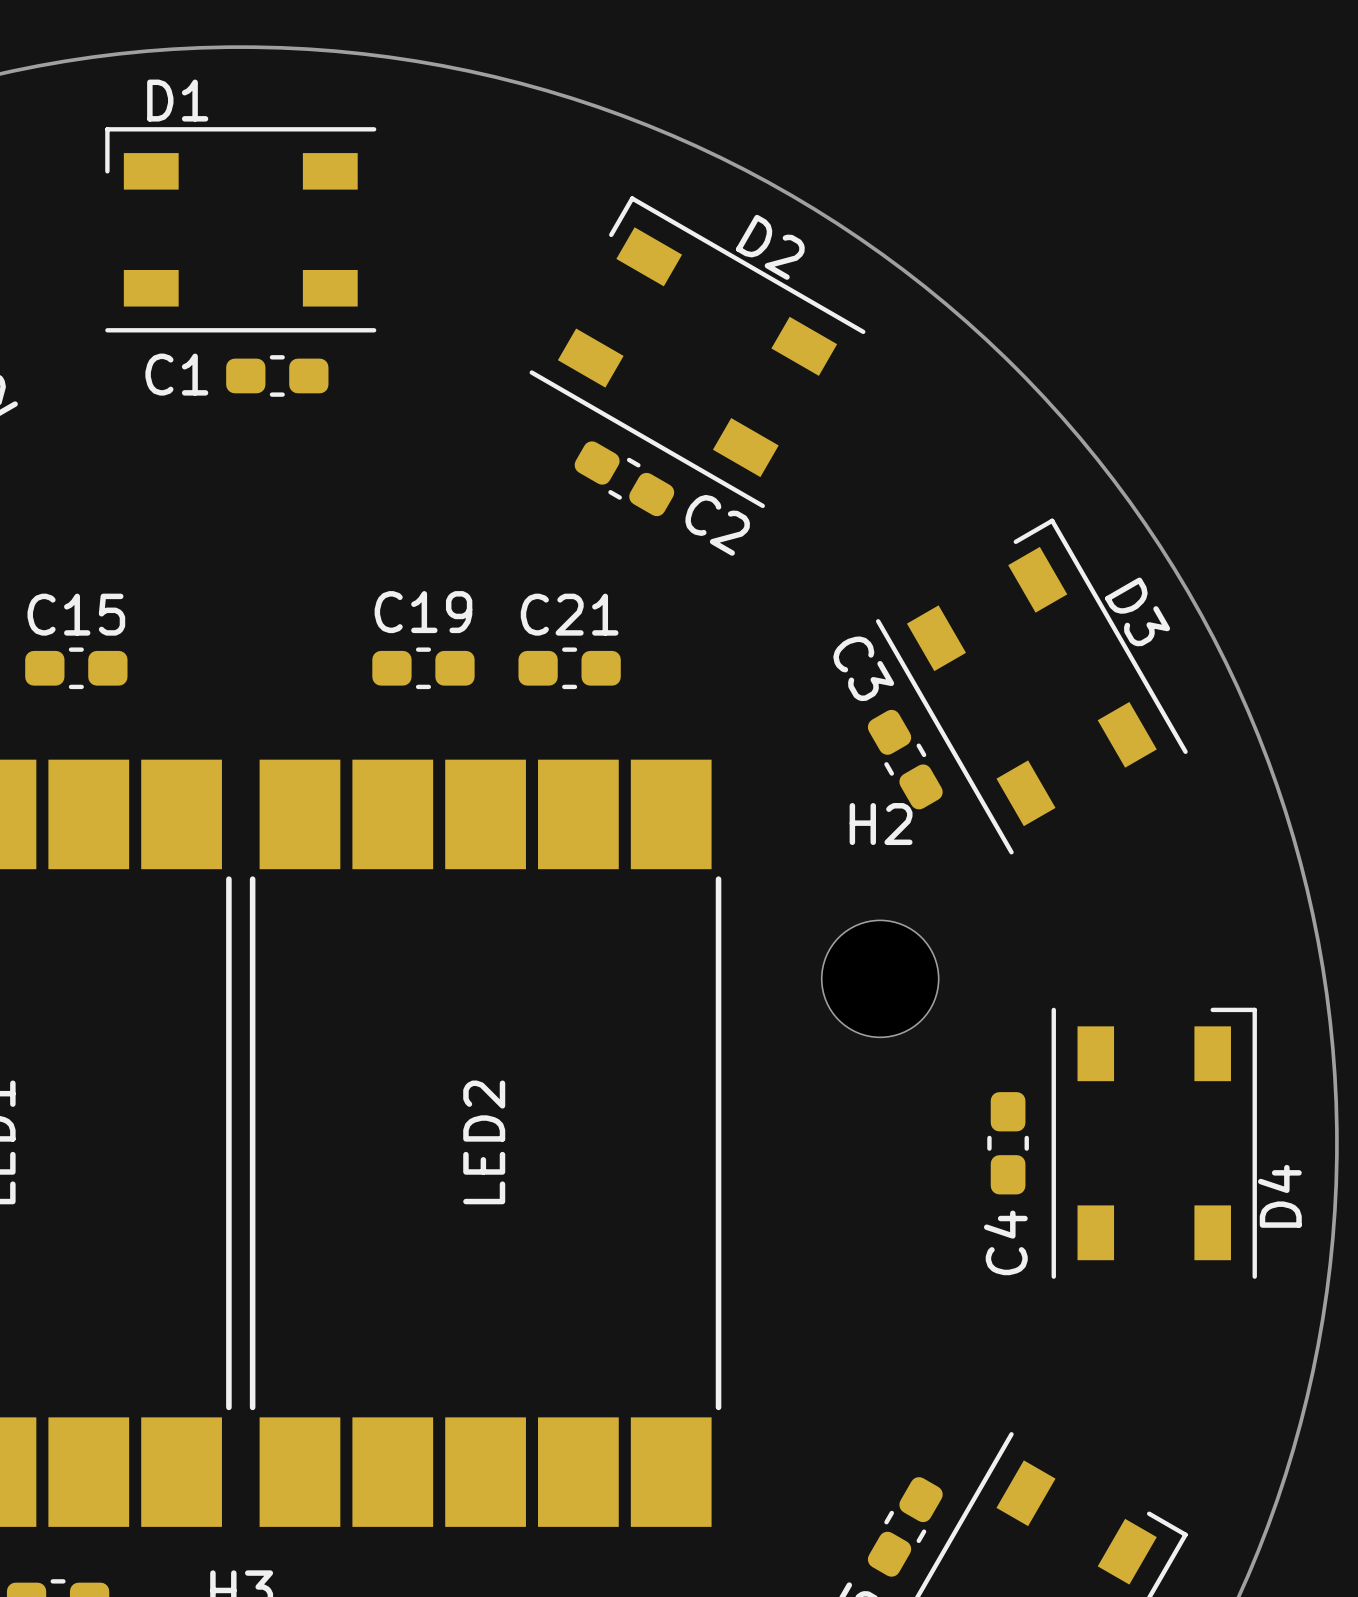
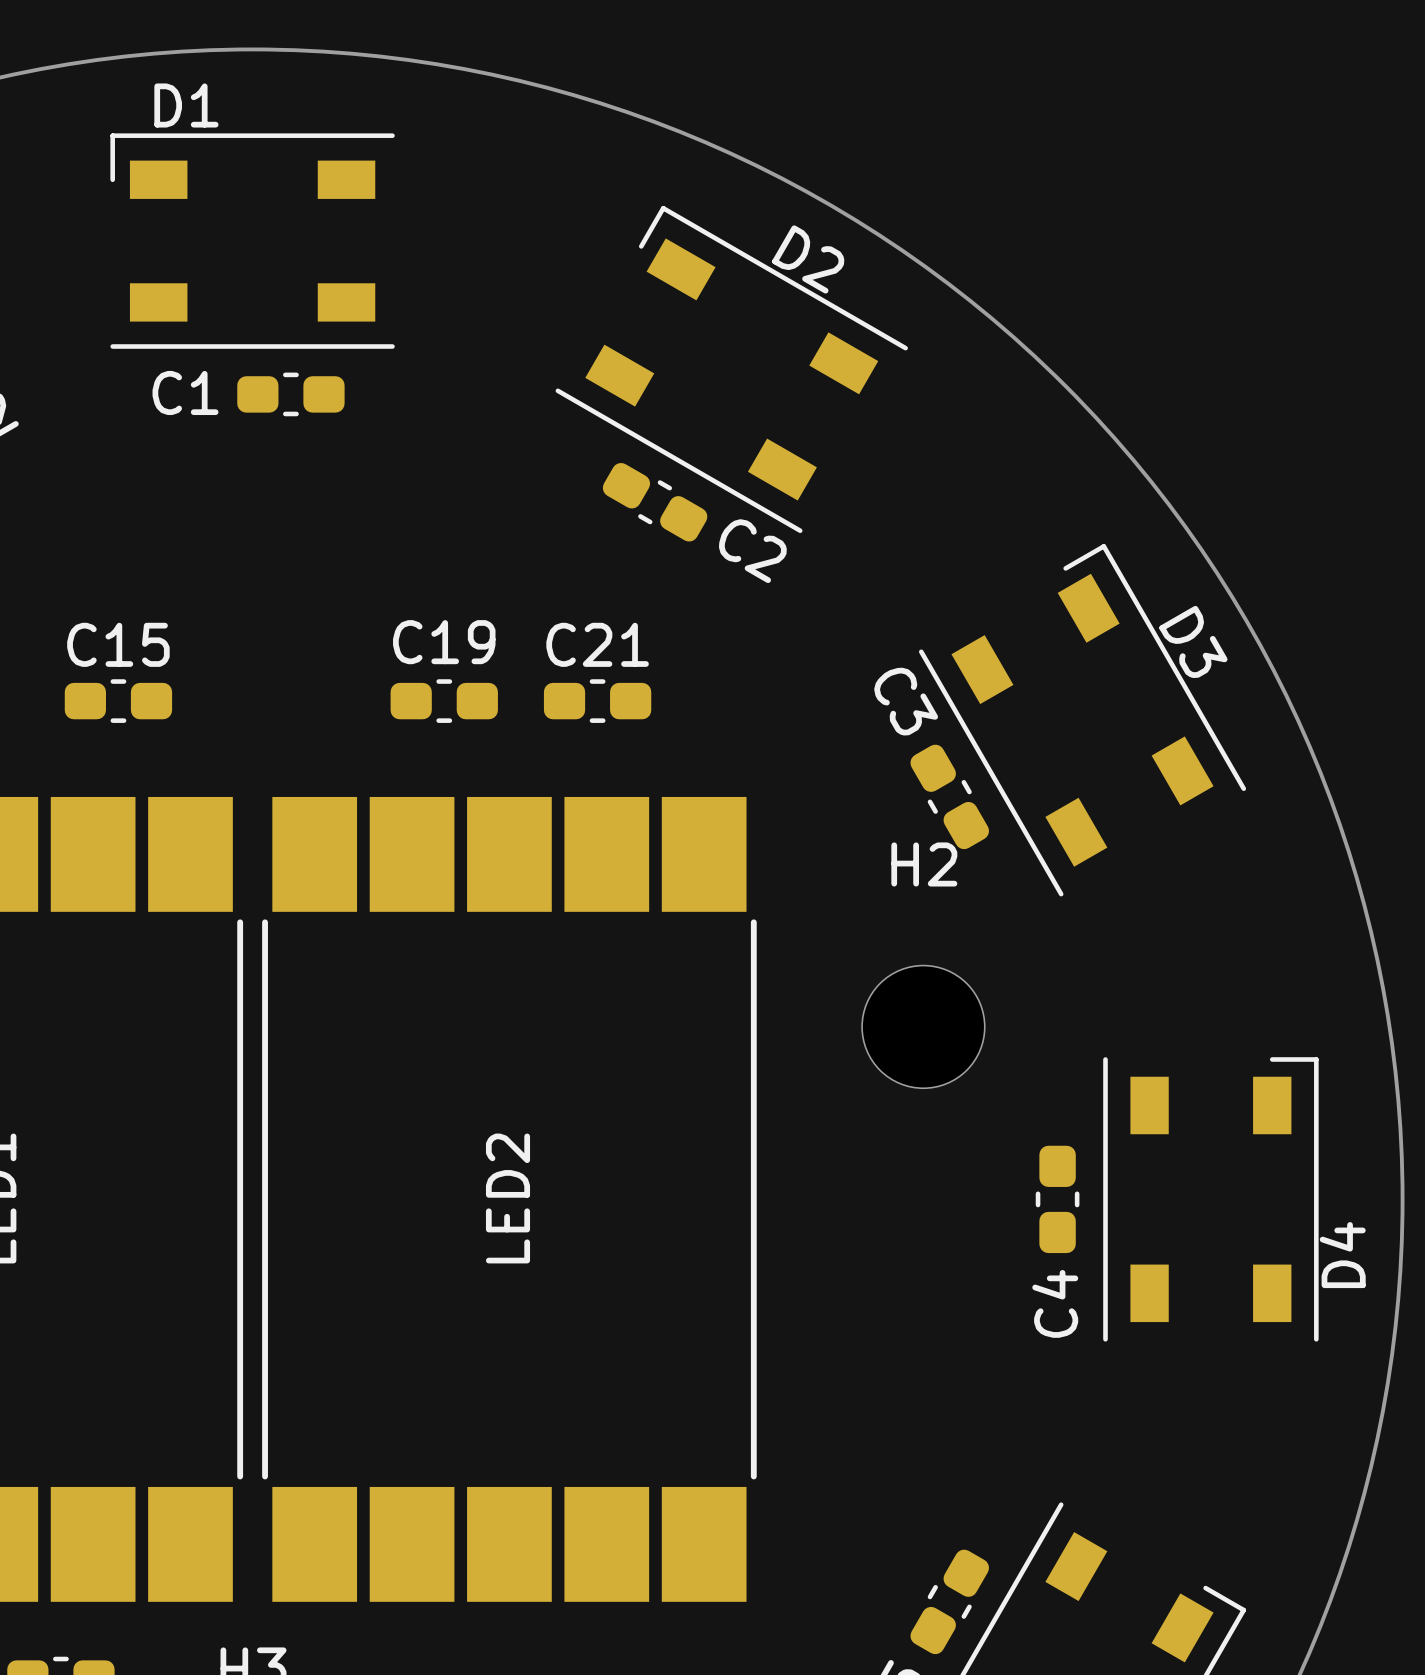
C15 position: (76, 668) -> (118, 701)

